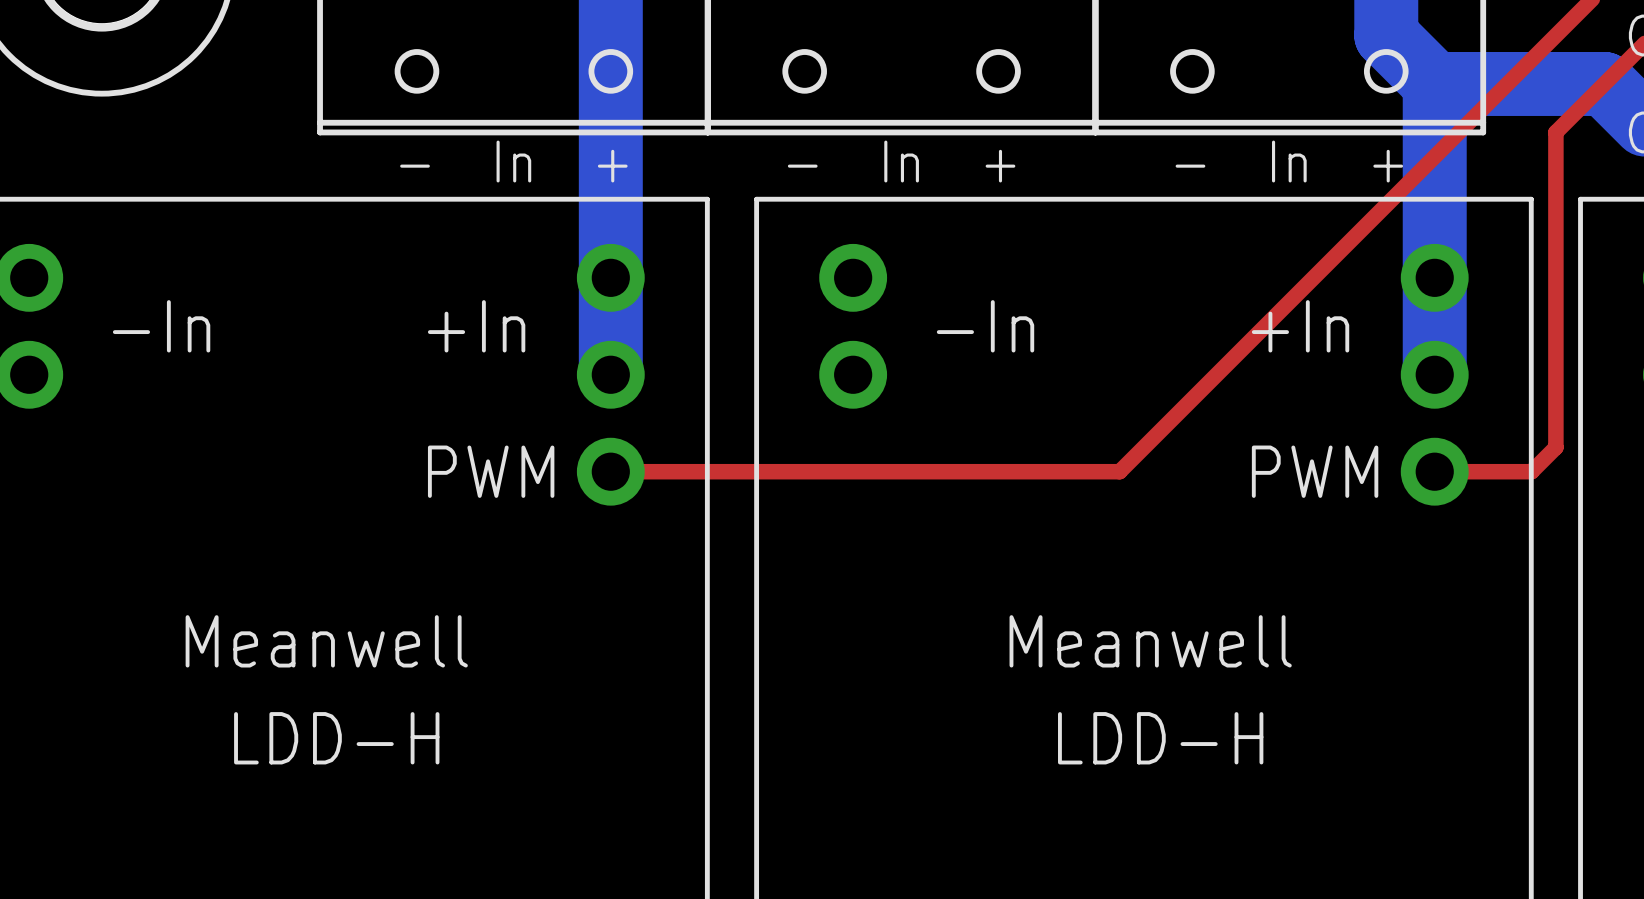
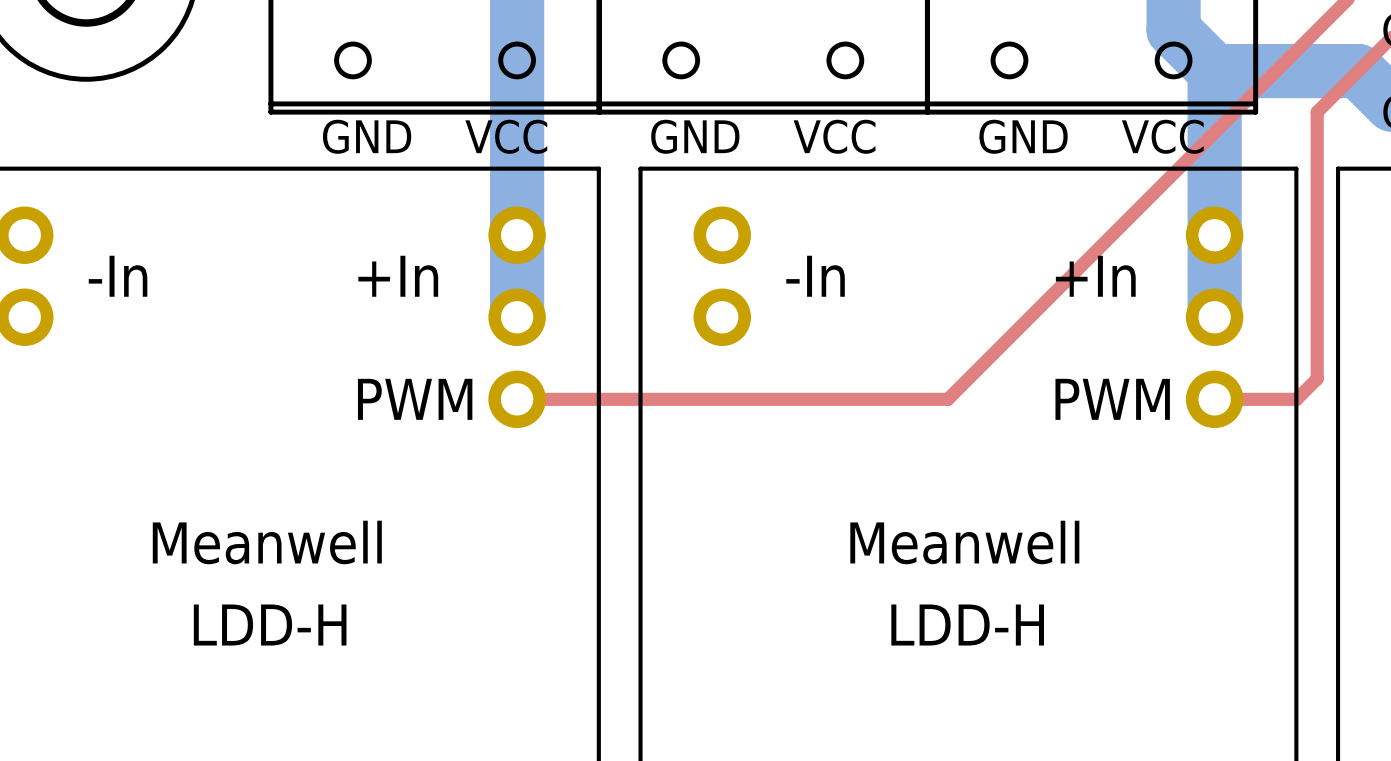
text: - In + (513, 161) -> GND VCC (435, 136)
text: - In + (901, 161) -> GND VCC (763, 136)
text: - In + (1289, 161) -> GND VCC (1091, 136)

